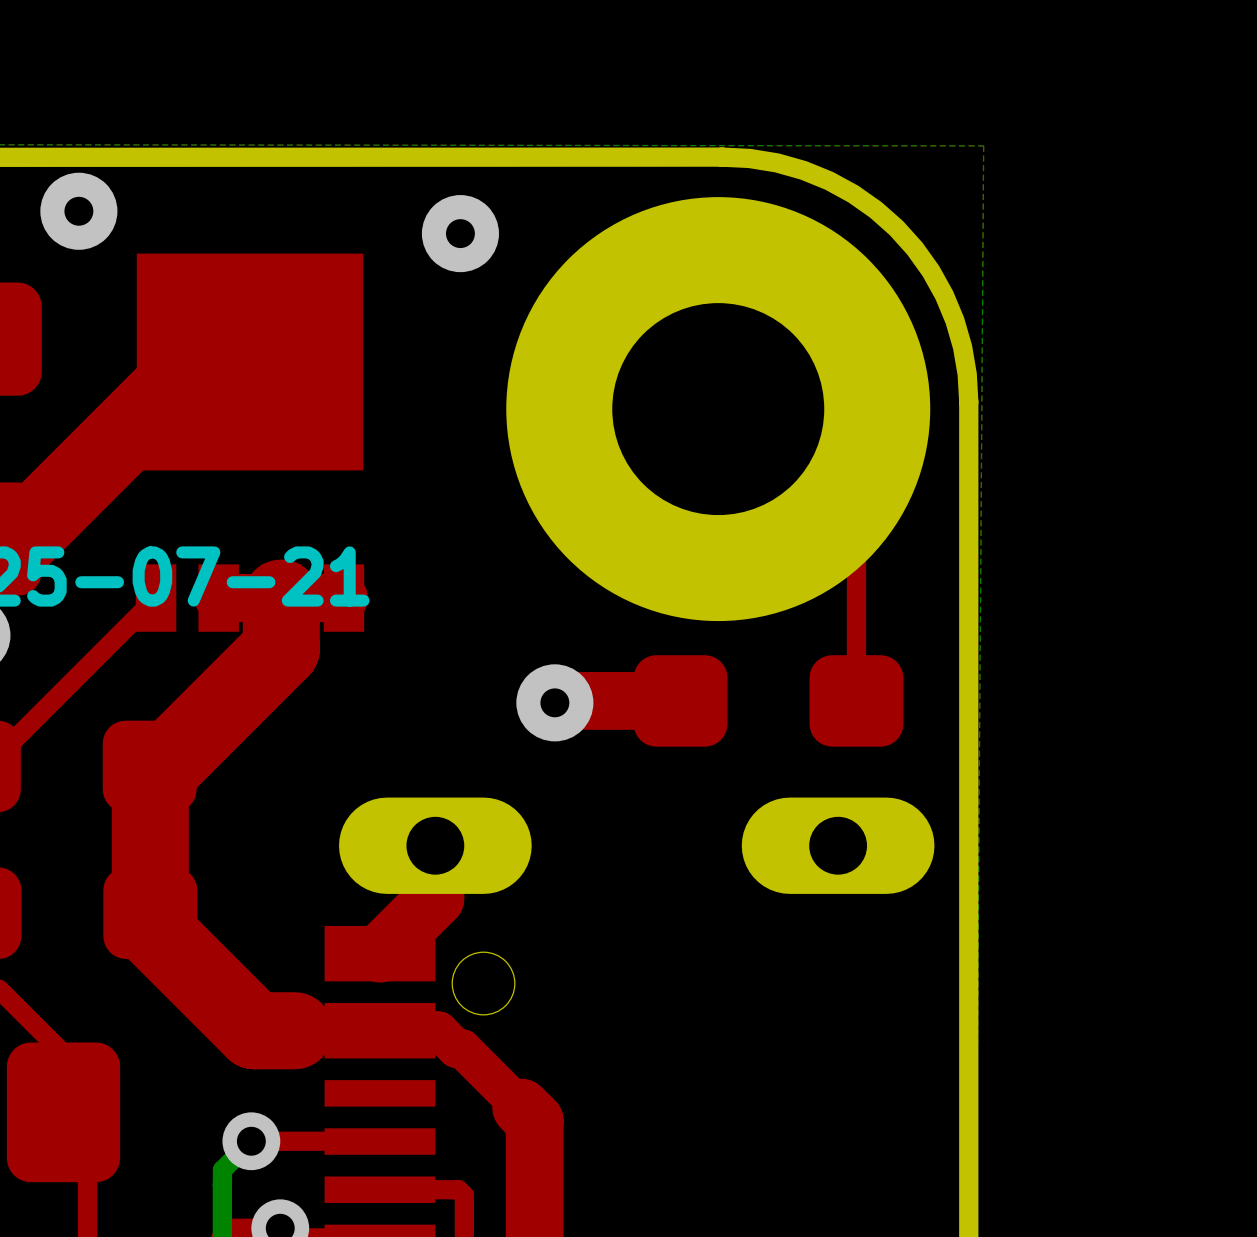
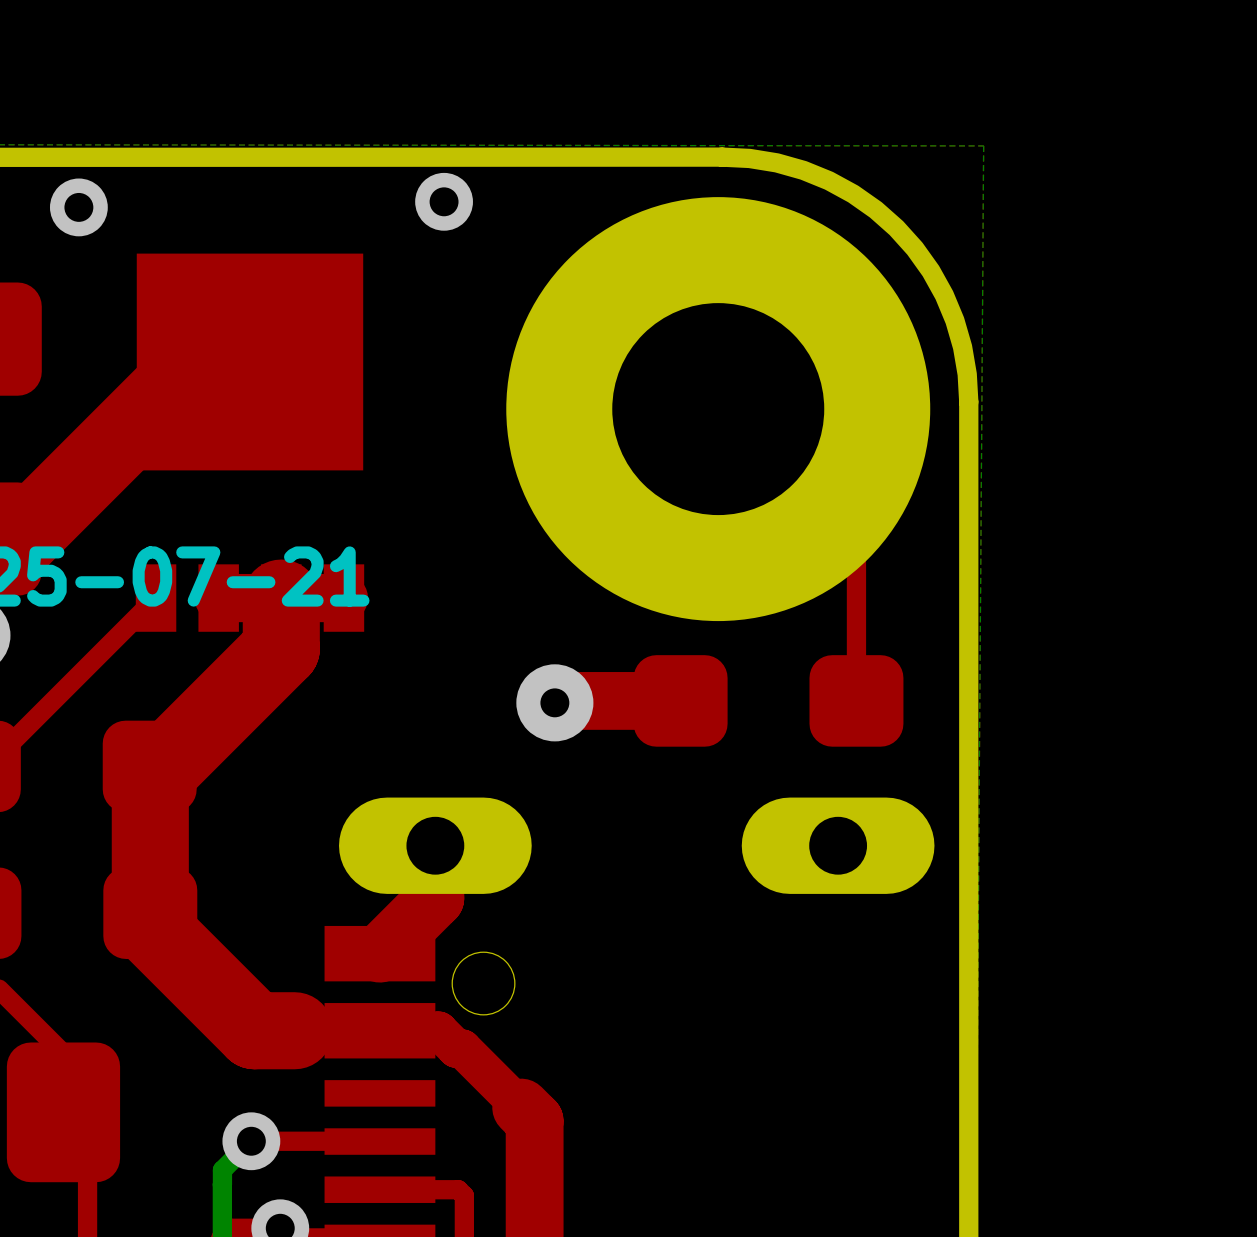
via size: [40, 172, 118, 250] -> [49, 178, 108, 237]
via size: [421, 195, 499, 273] -> [415, 172, 473, 231]

